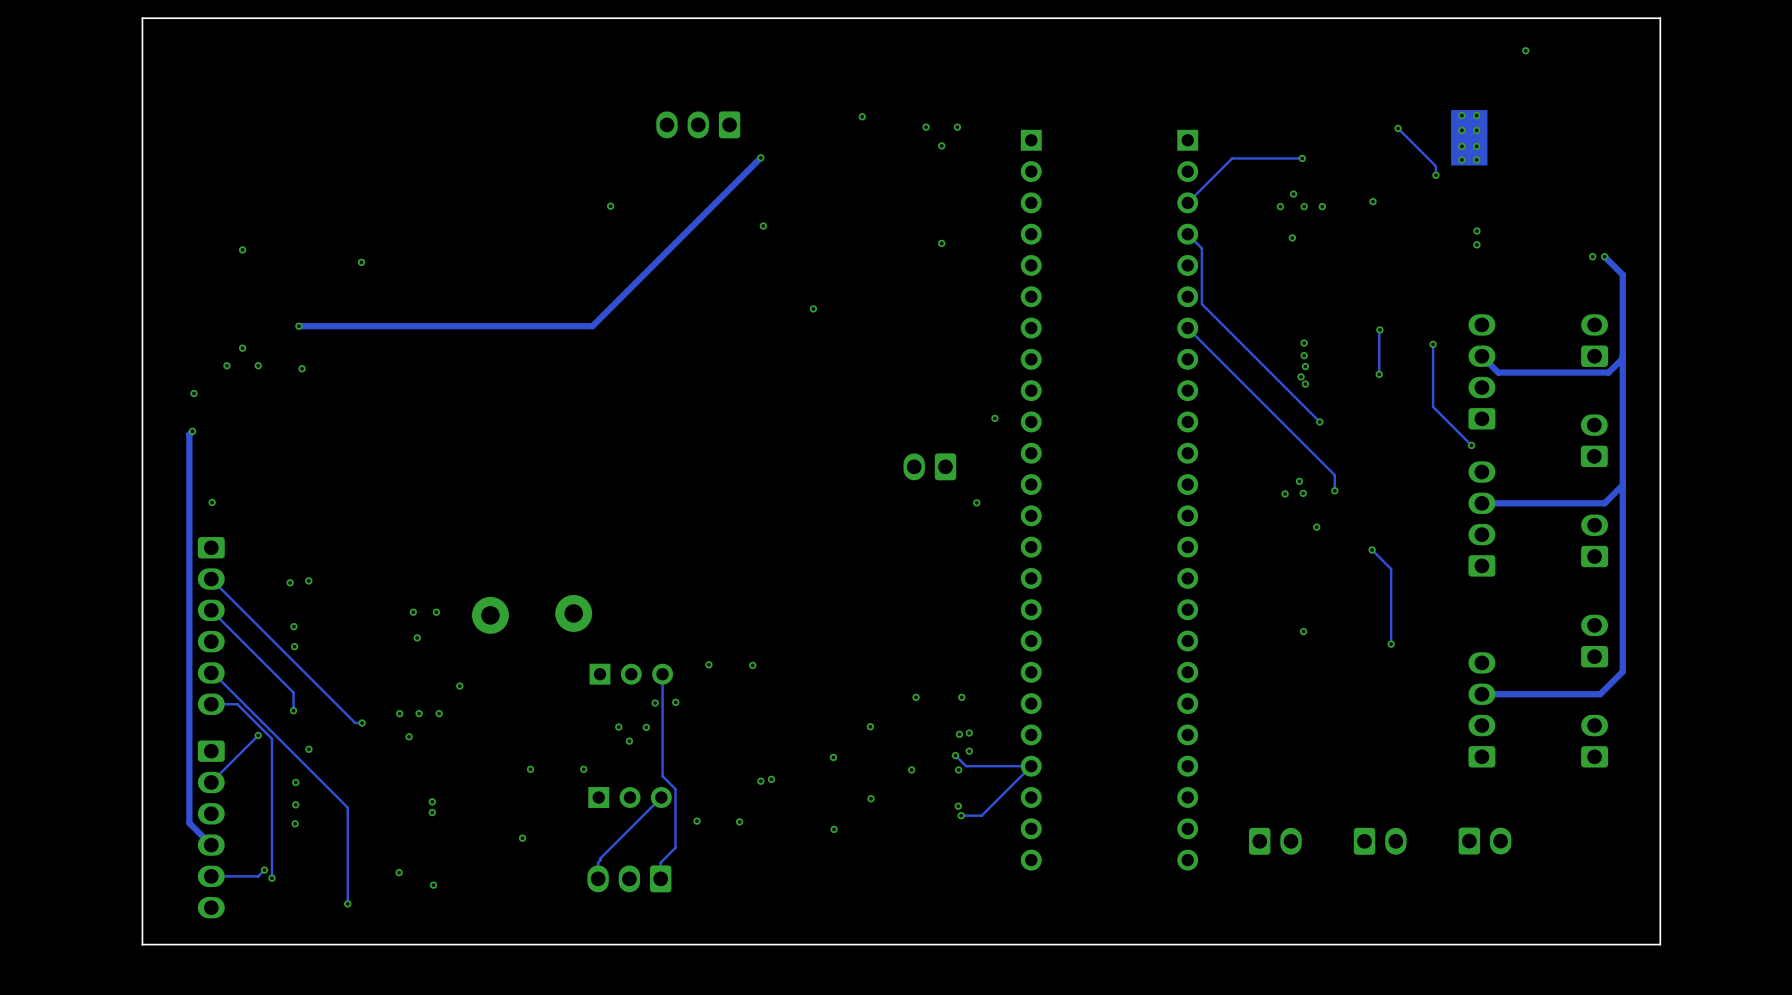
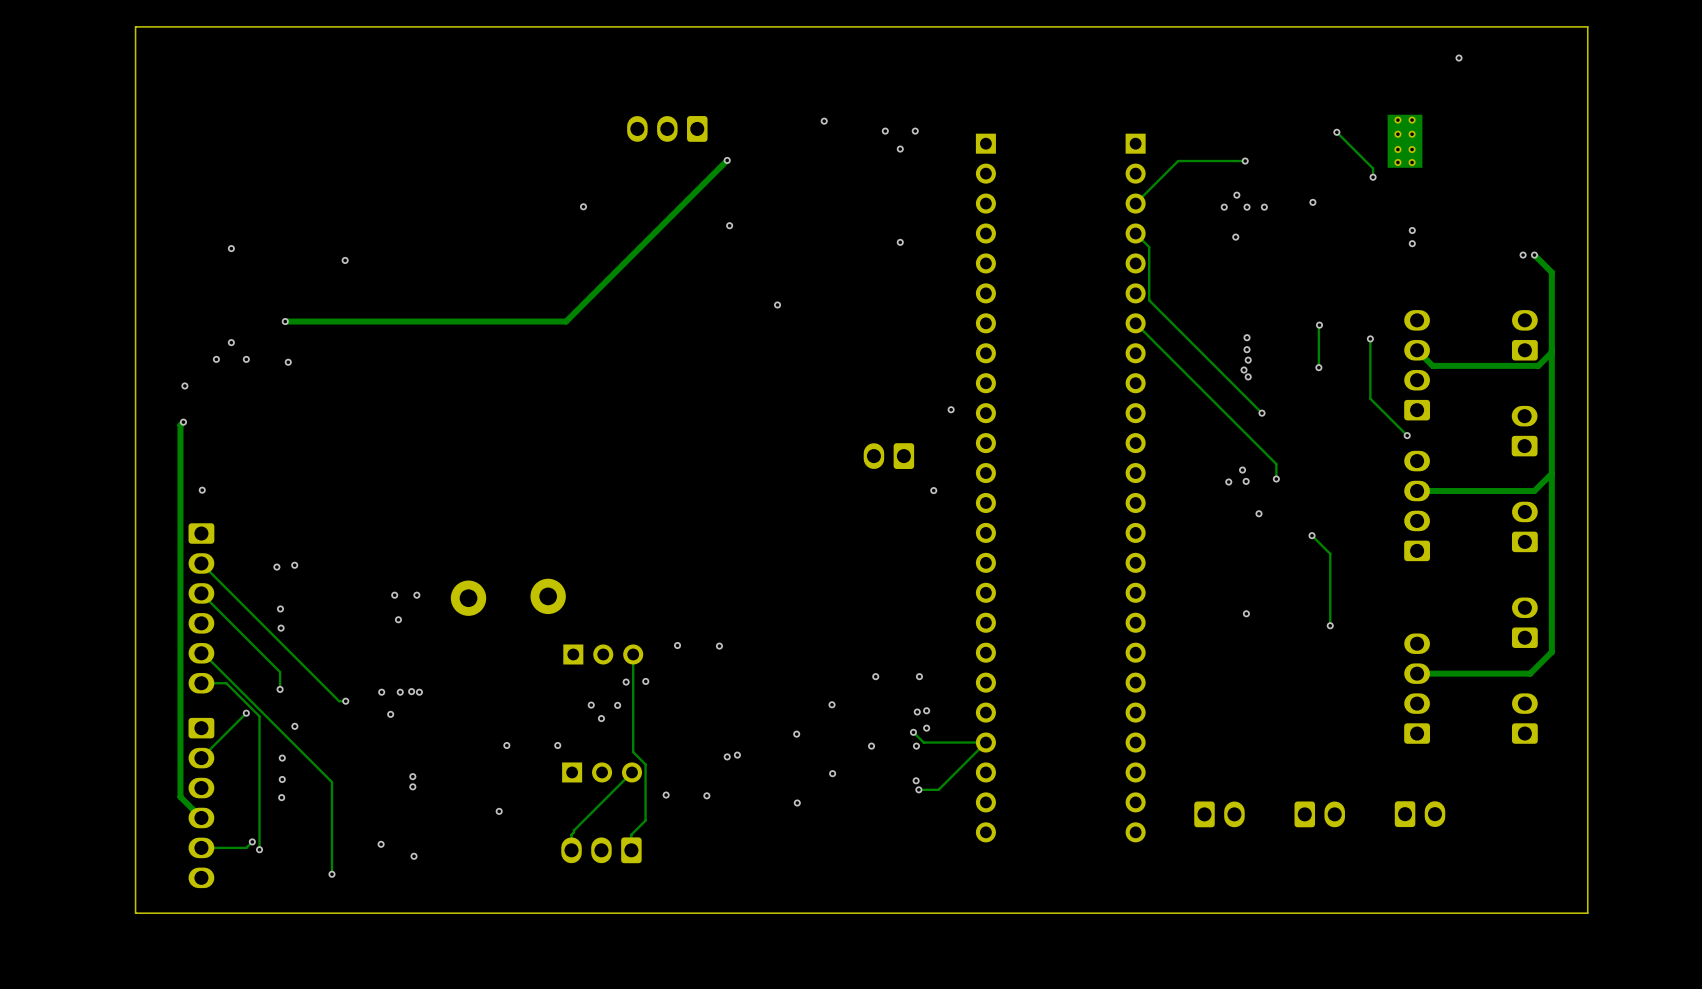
via position: (459, 686) -> (411, 691)

